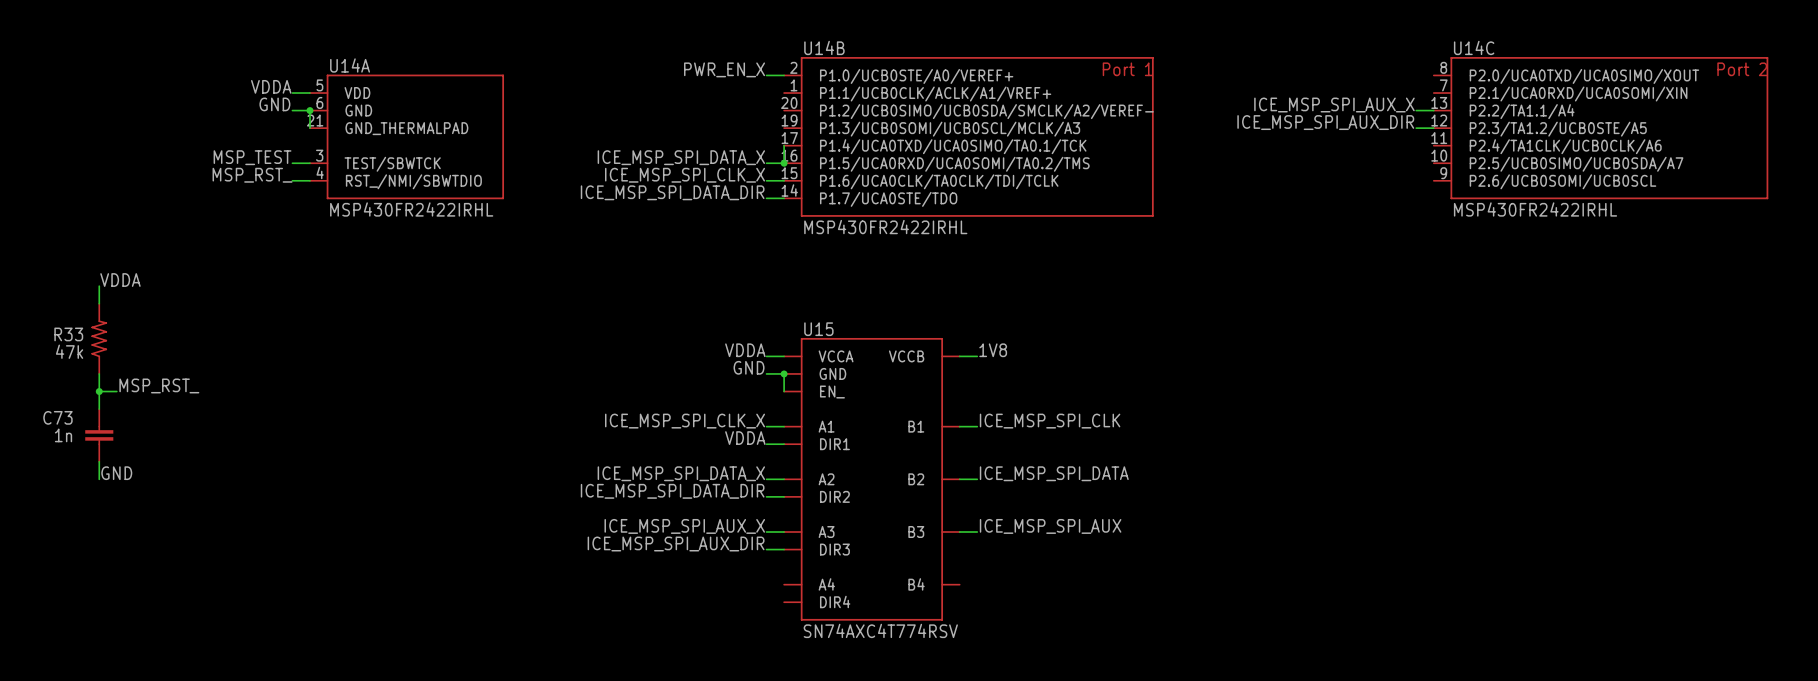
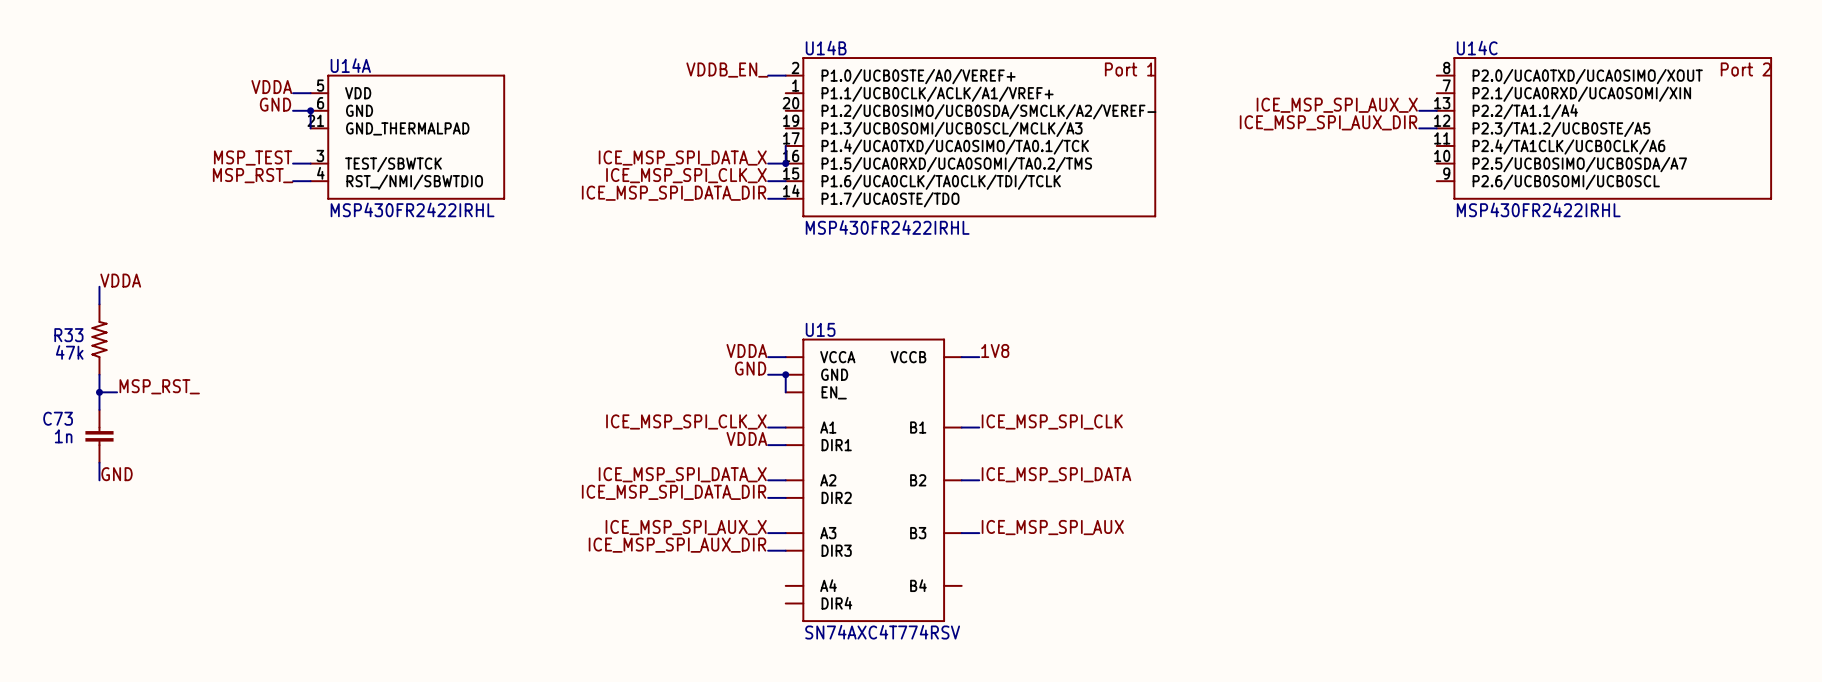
label: PWR_EN_X (724, 69) -> VDDB_EN_ (727, 70)

